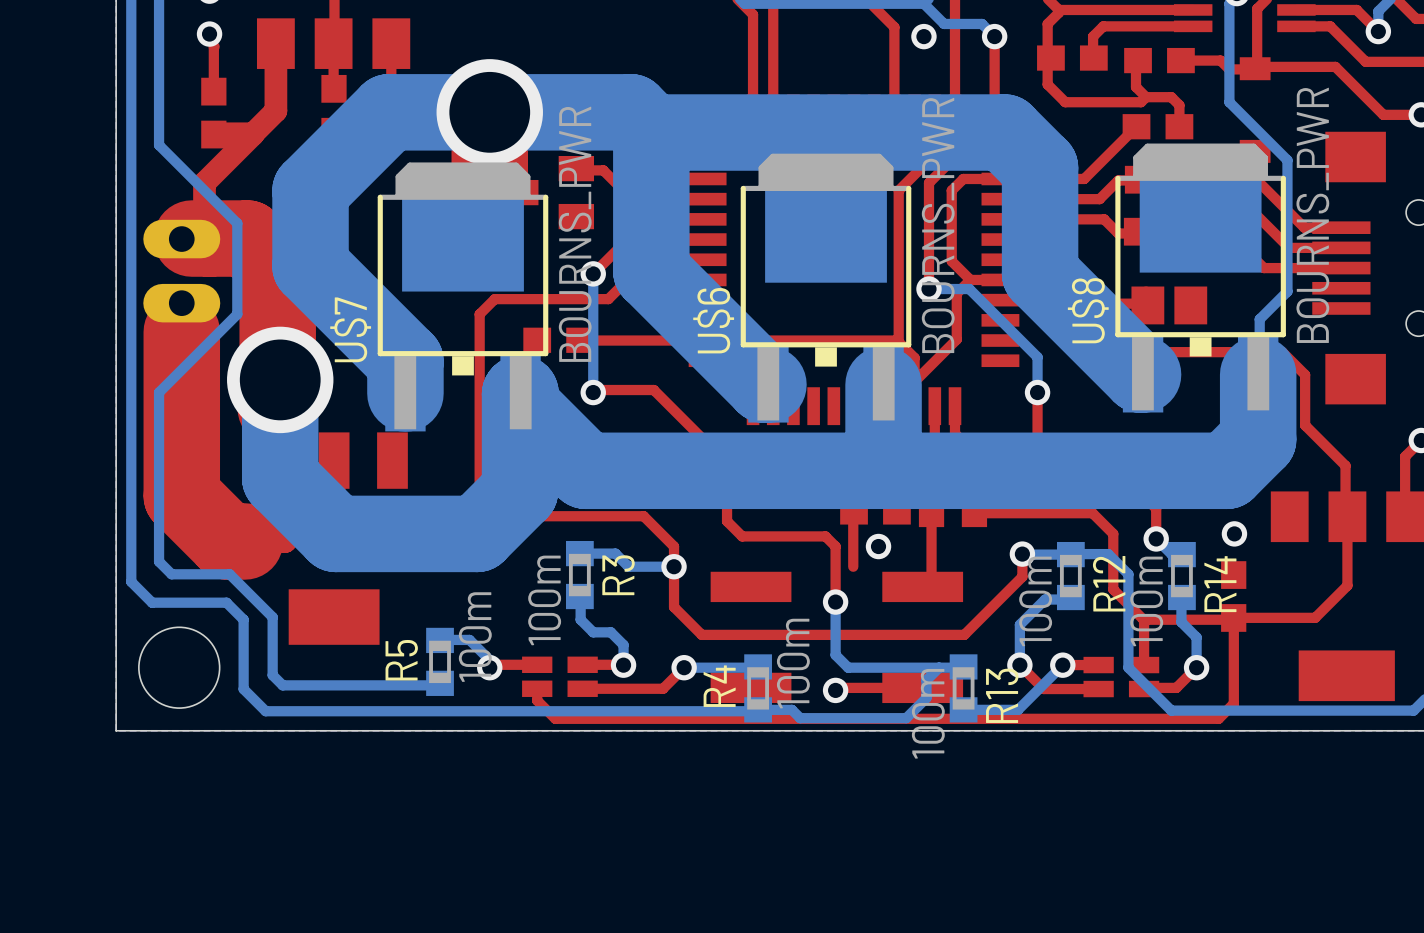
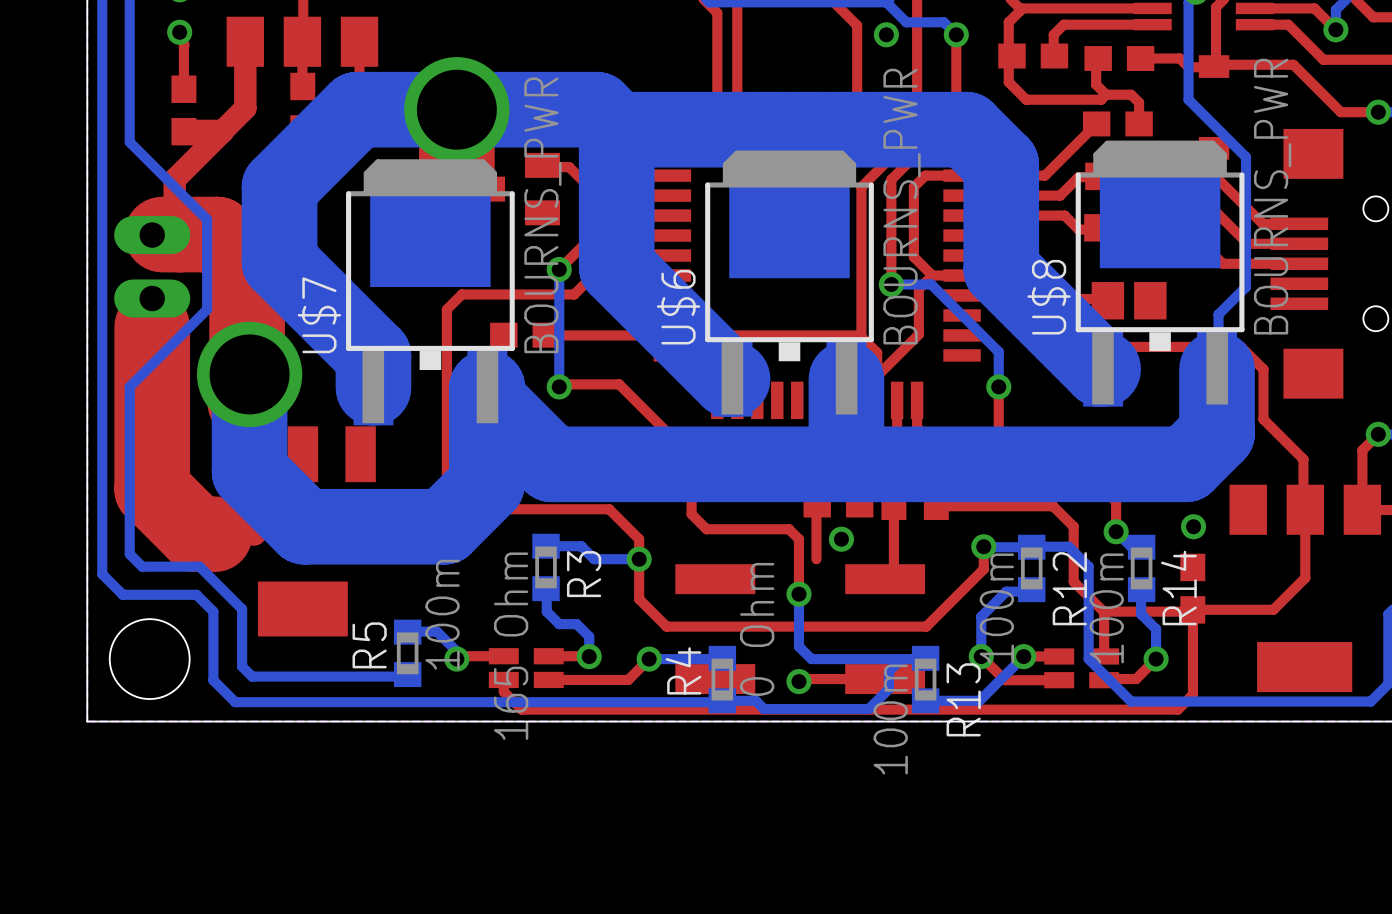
R3 value: 100m (544, 600) -> 165 Ohm (511, 646)
R4 value: 100m (793, 663) -> 0 Ohm (757, 629)

